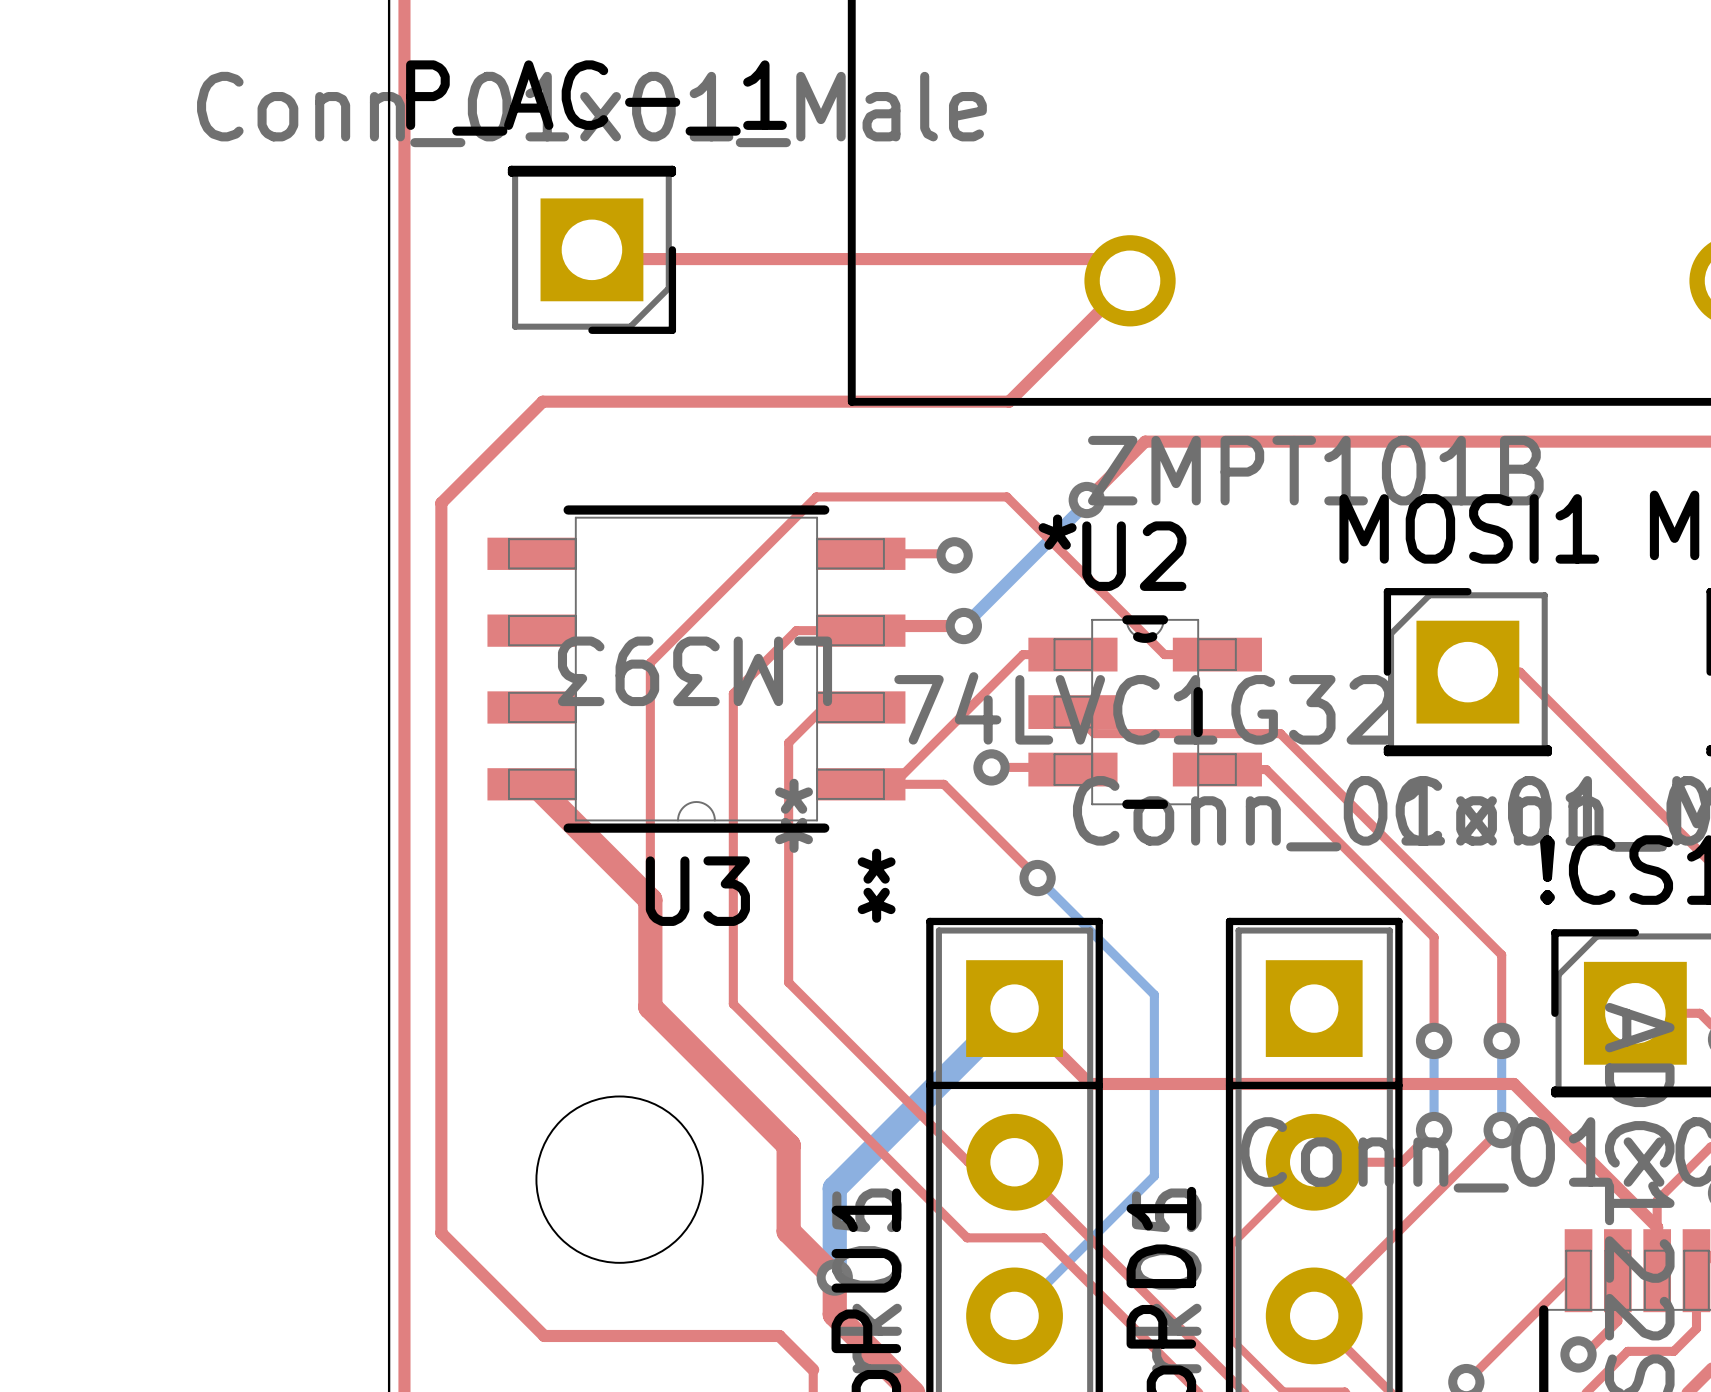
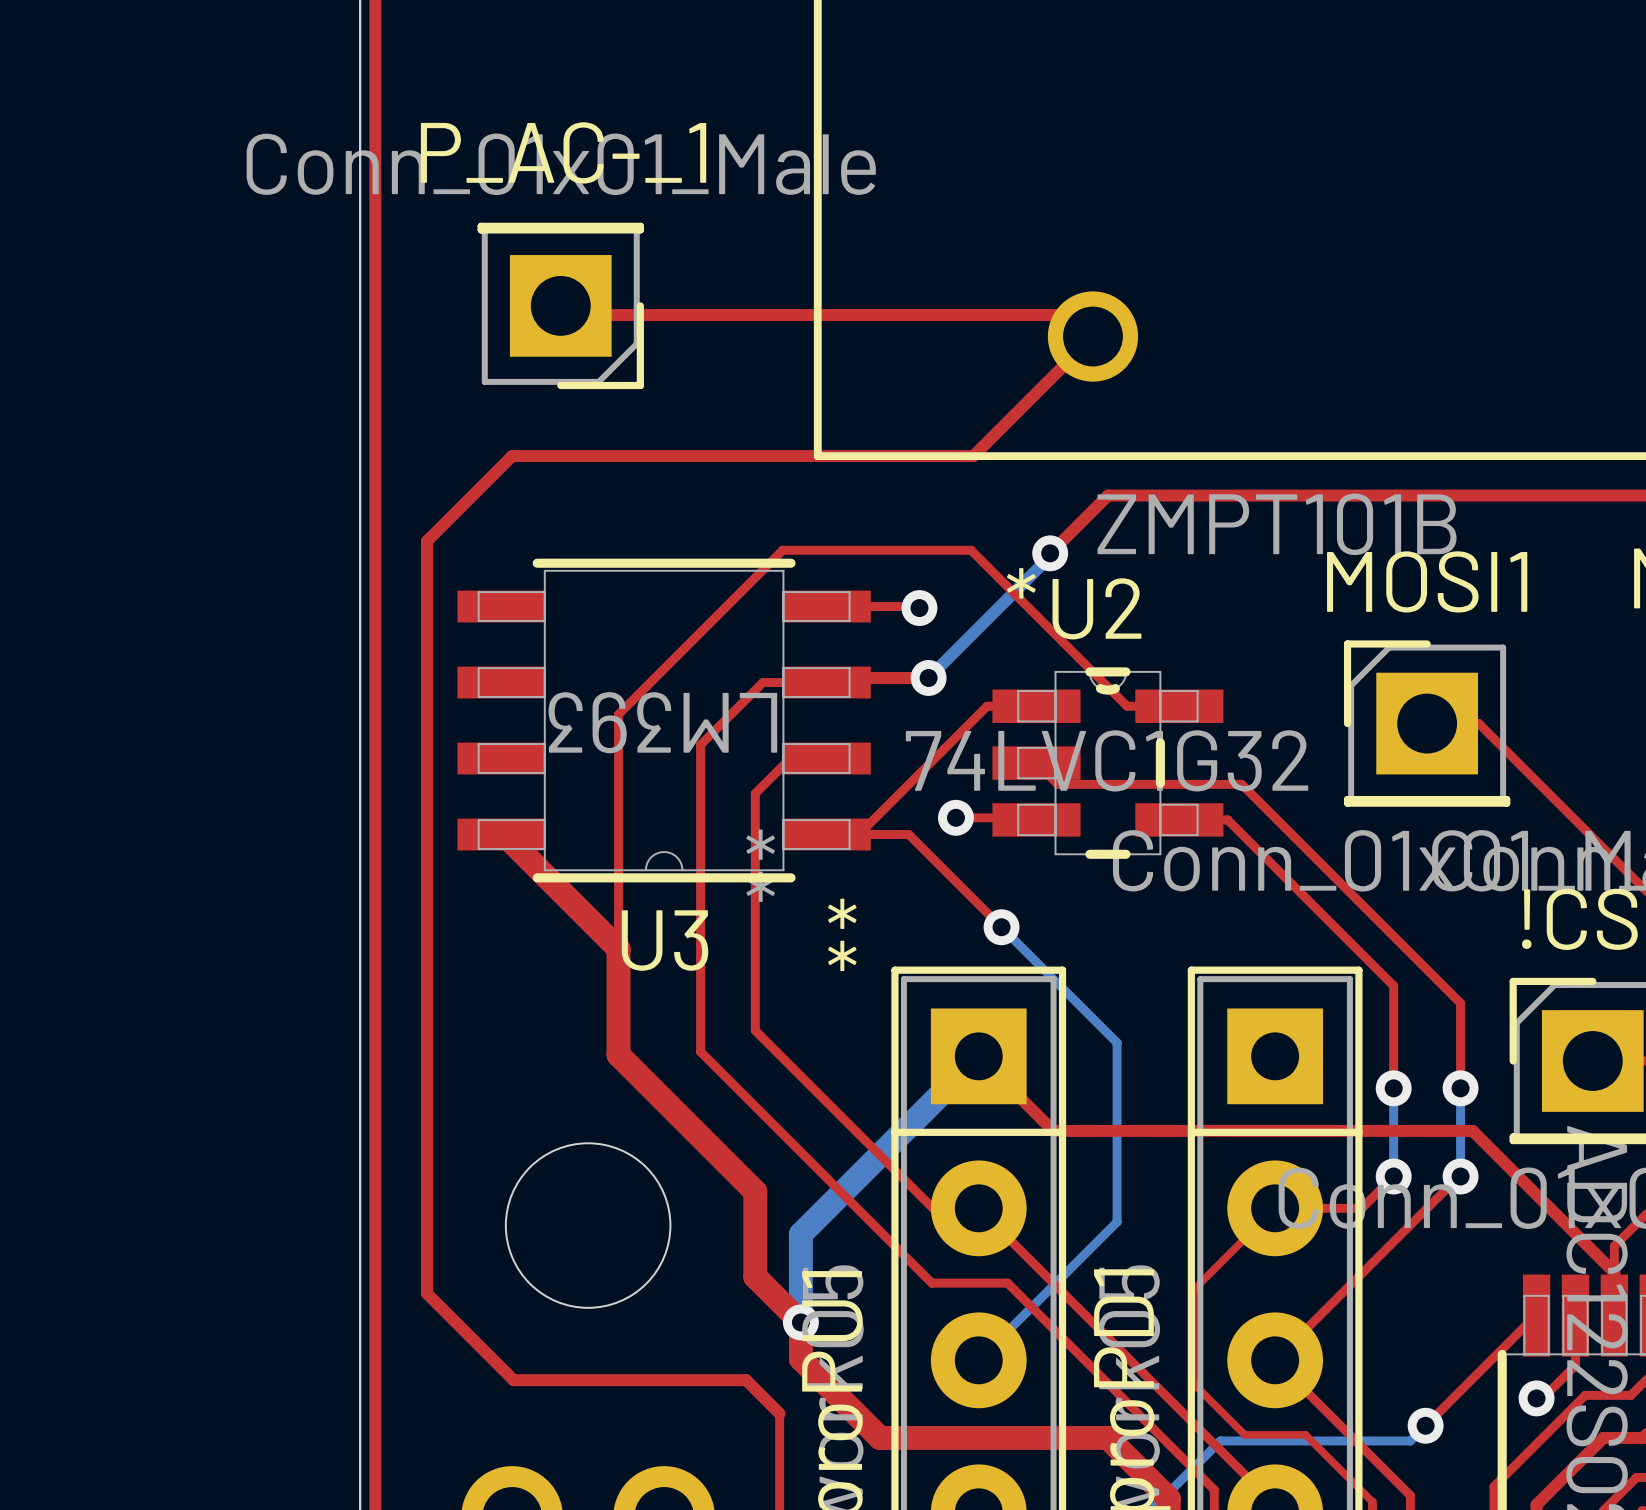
top track: (456, 487) (441, 503) (441, 1233) (456, 1248) -> (427, 541) (427, 1293)

